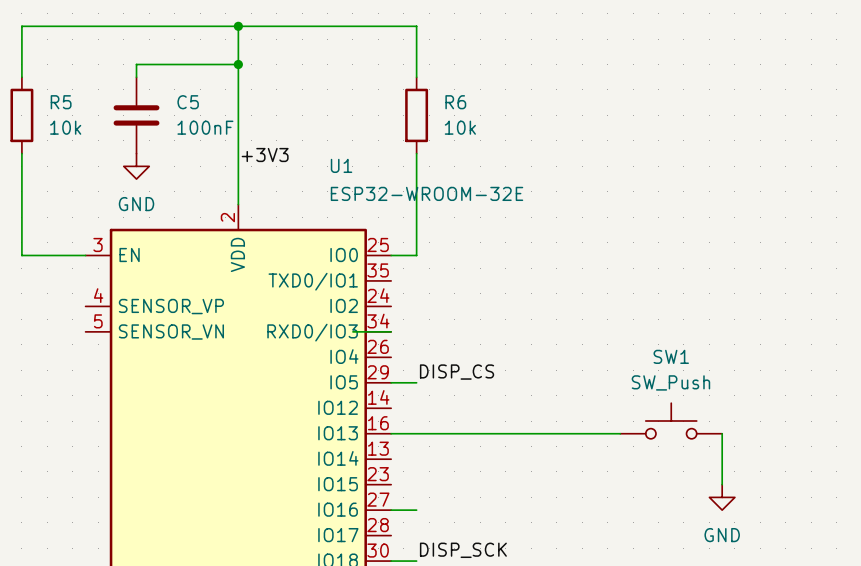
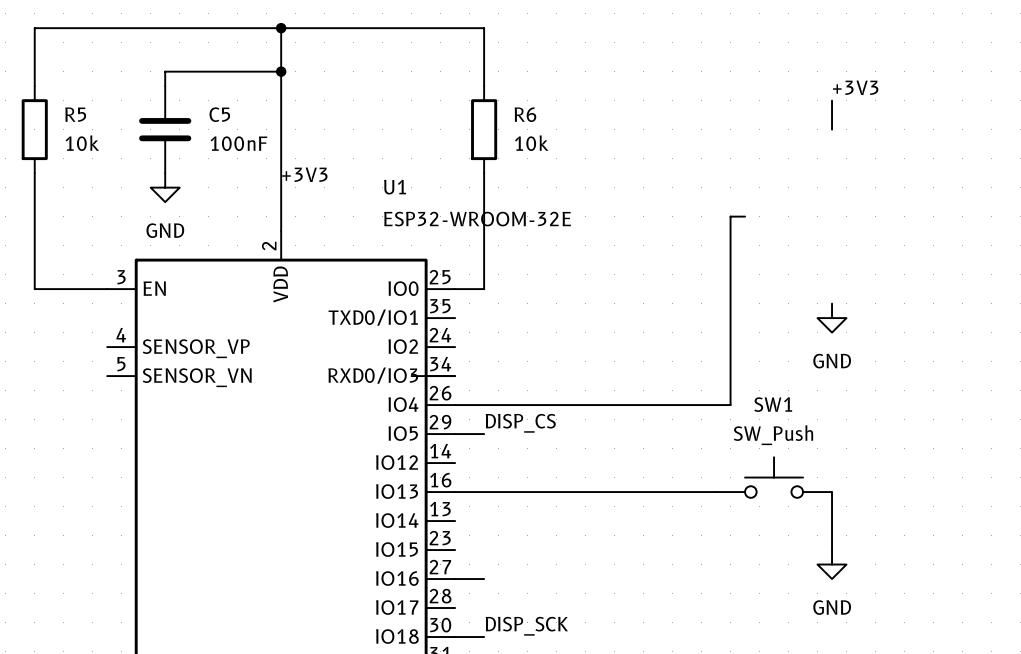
label: none -> +3V3 (855, 87)
wire: none -> (832, 100) (832, 129)
wire: none -> (745, 216) (730, 216) (730, 405) (455, 405)
power symbol: none -> GND (832, 318)

